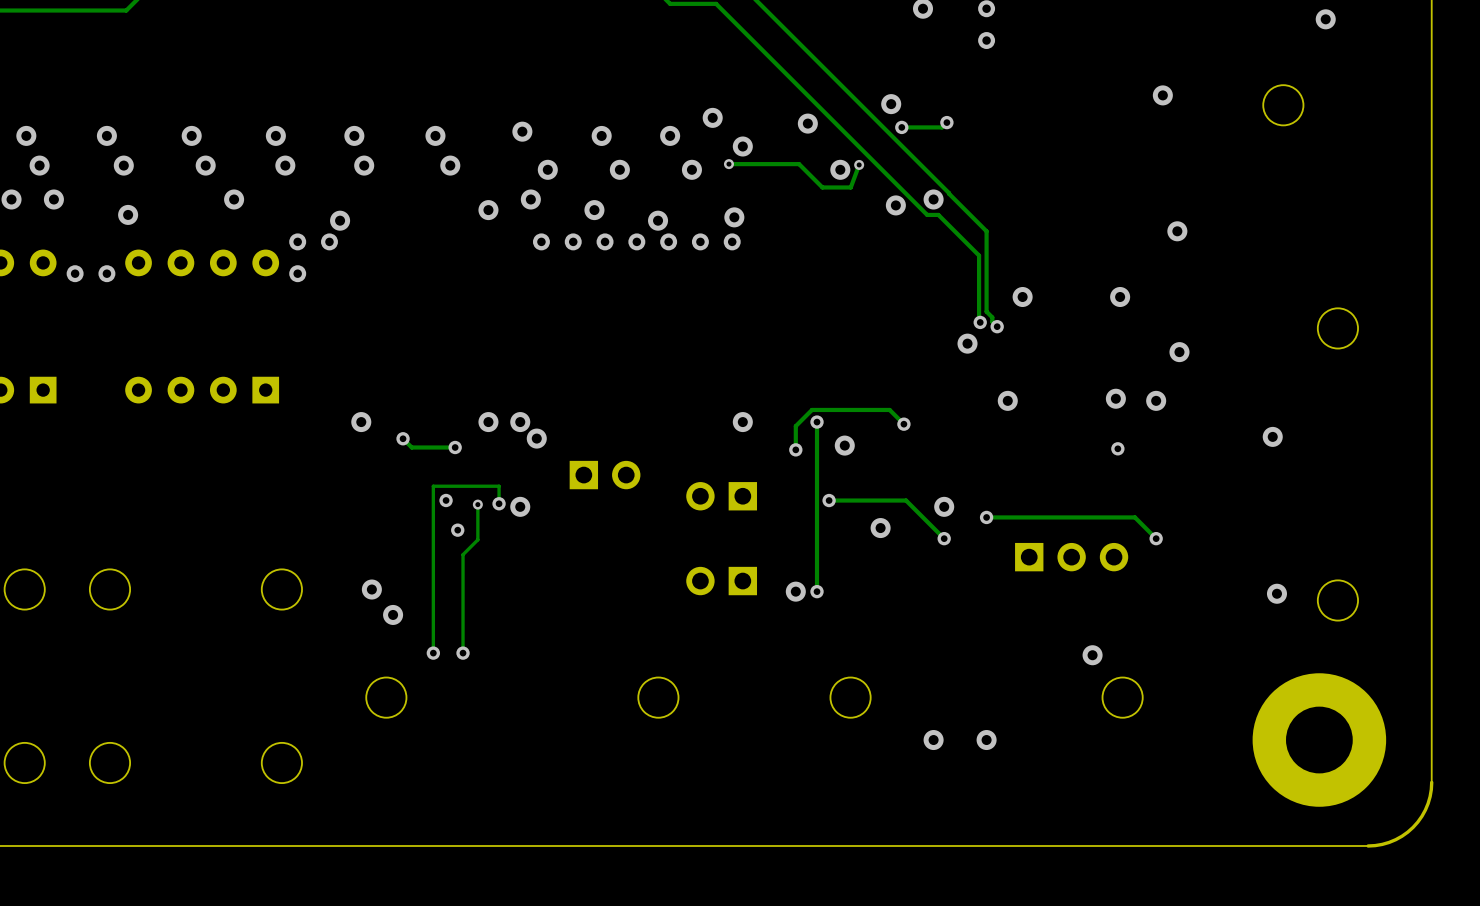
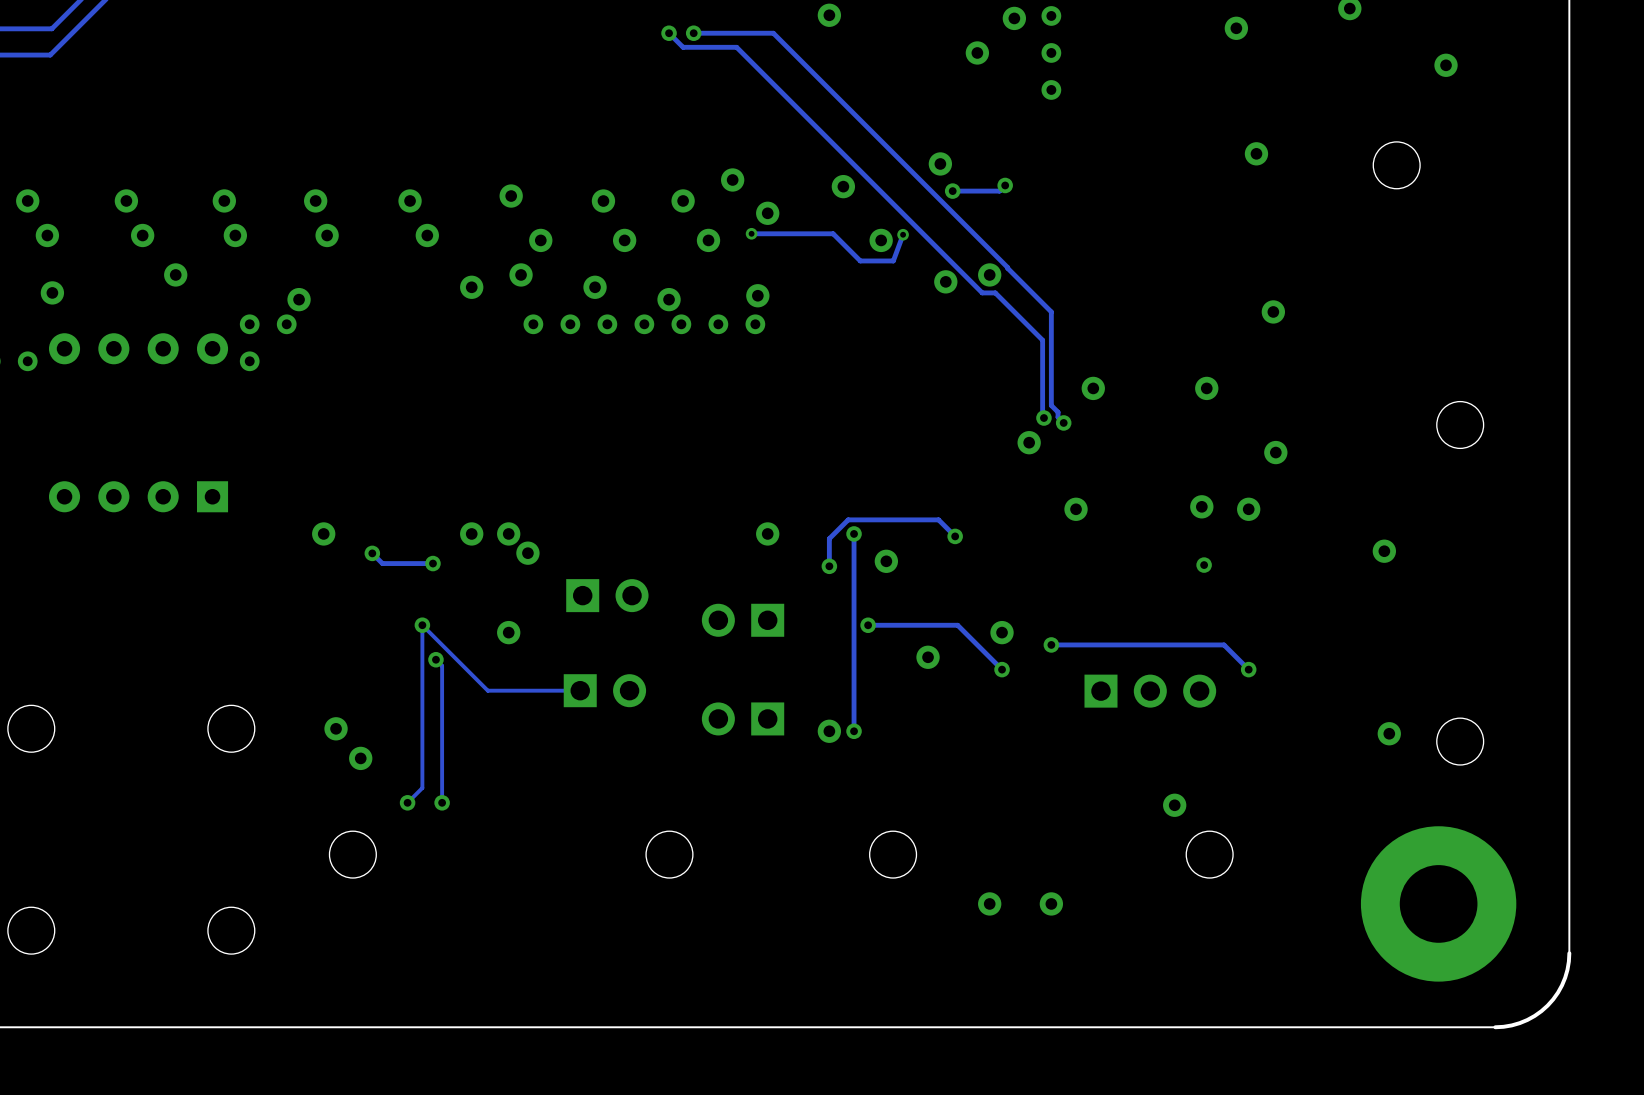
track: (499, 503) (499, 486) (433, 486) (433, 653) -> (580, 690) (487, 690) (422, 625) (422, 788) (407, 802)
via: (499, 503) -> none
track: (477, 504) (477, 539) (463, 554) -> (435, 659) (442, 665) (442, 688)
via: (477, 504) -> none
part: none -> (604, 690)

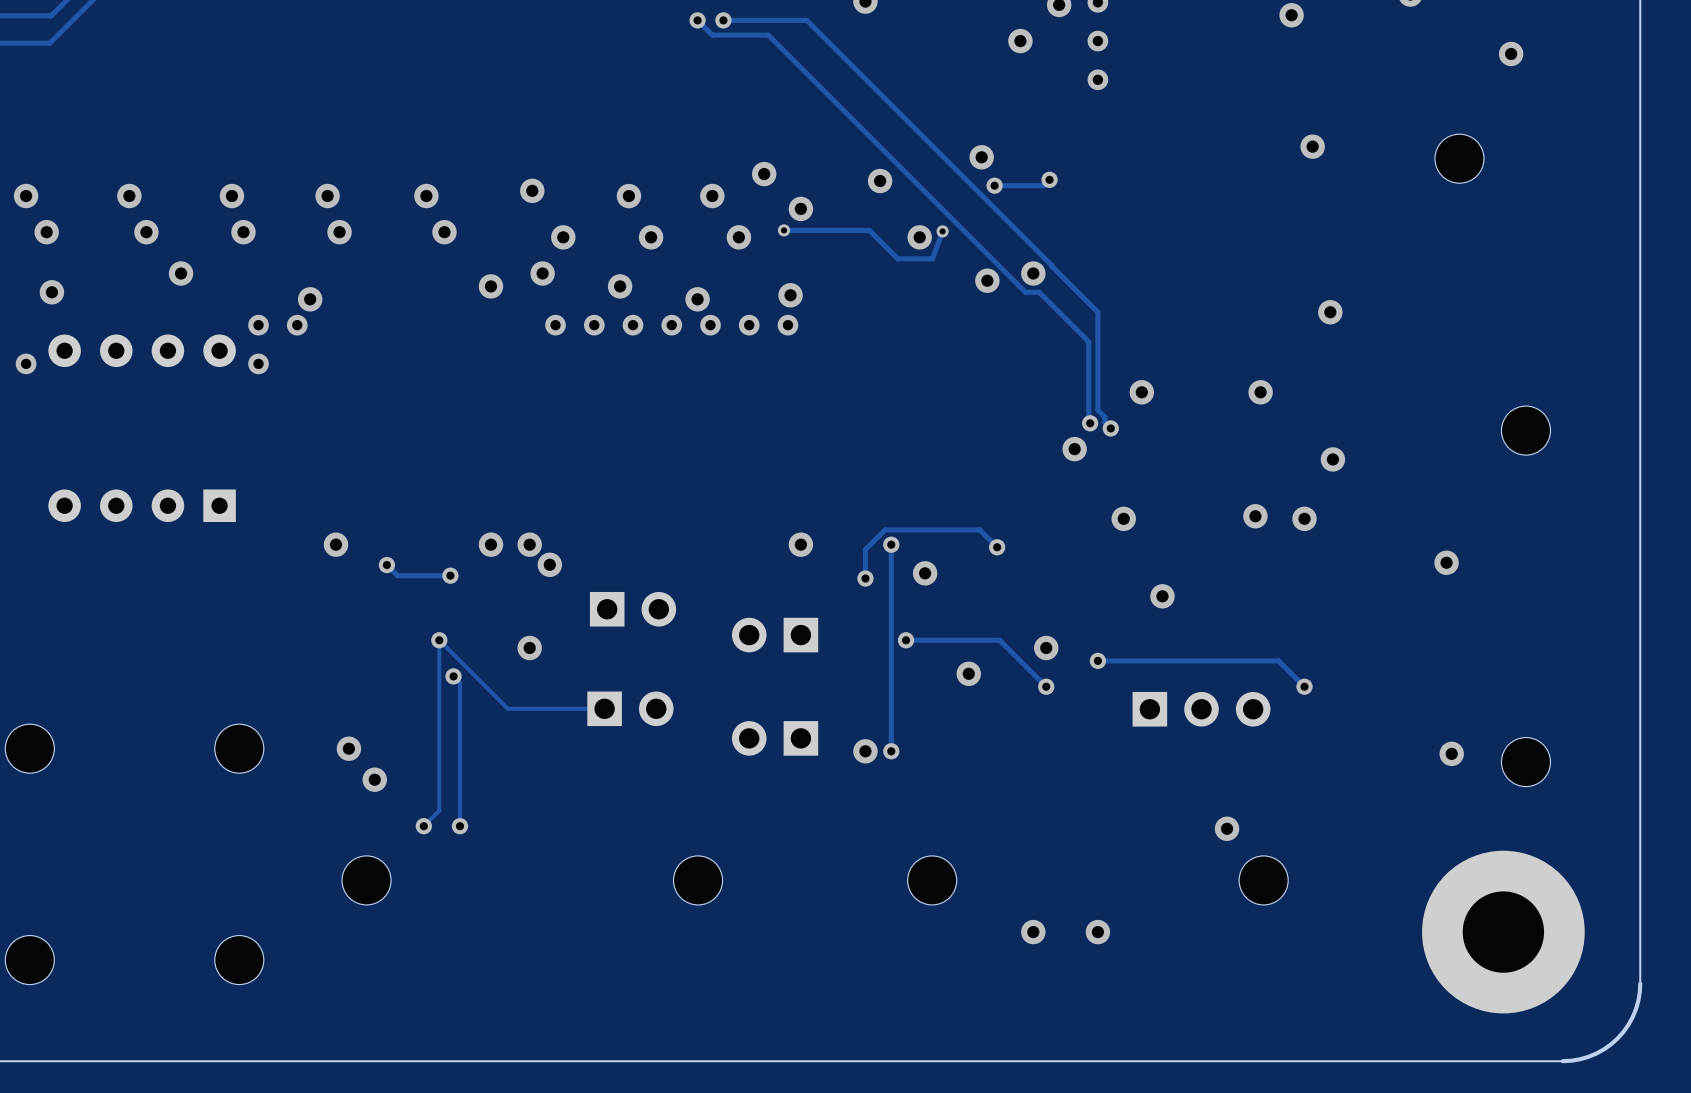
via: (1204, 565) -> none
via: none -> (1162, 596)

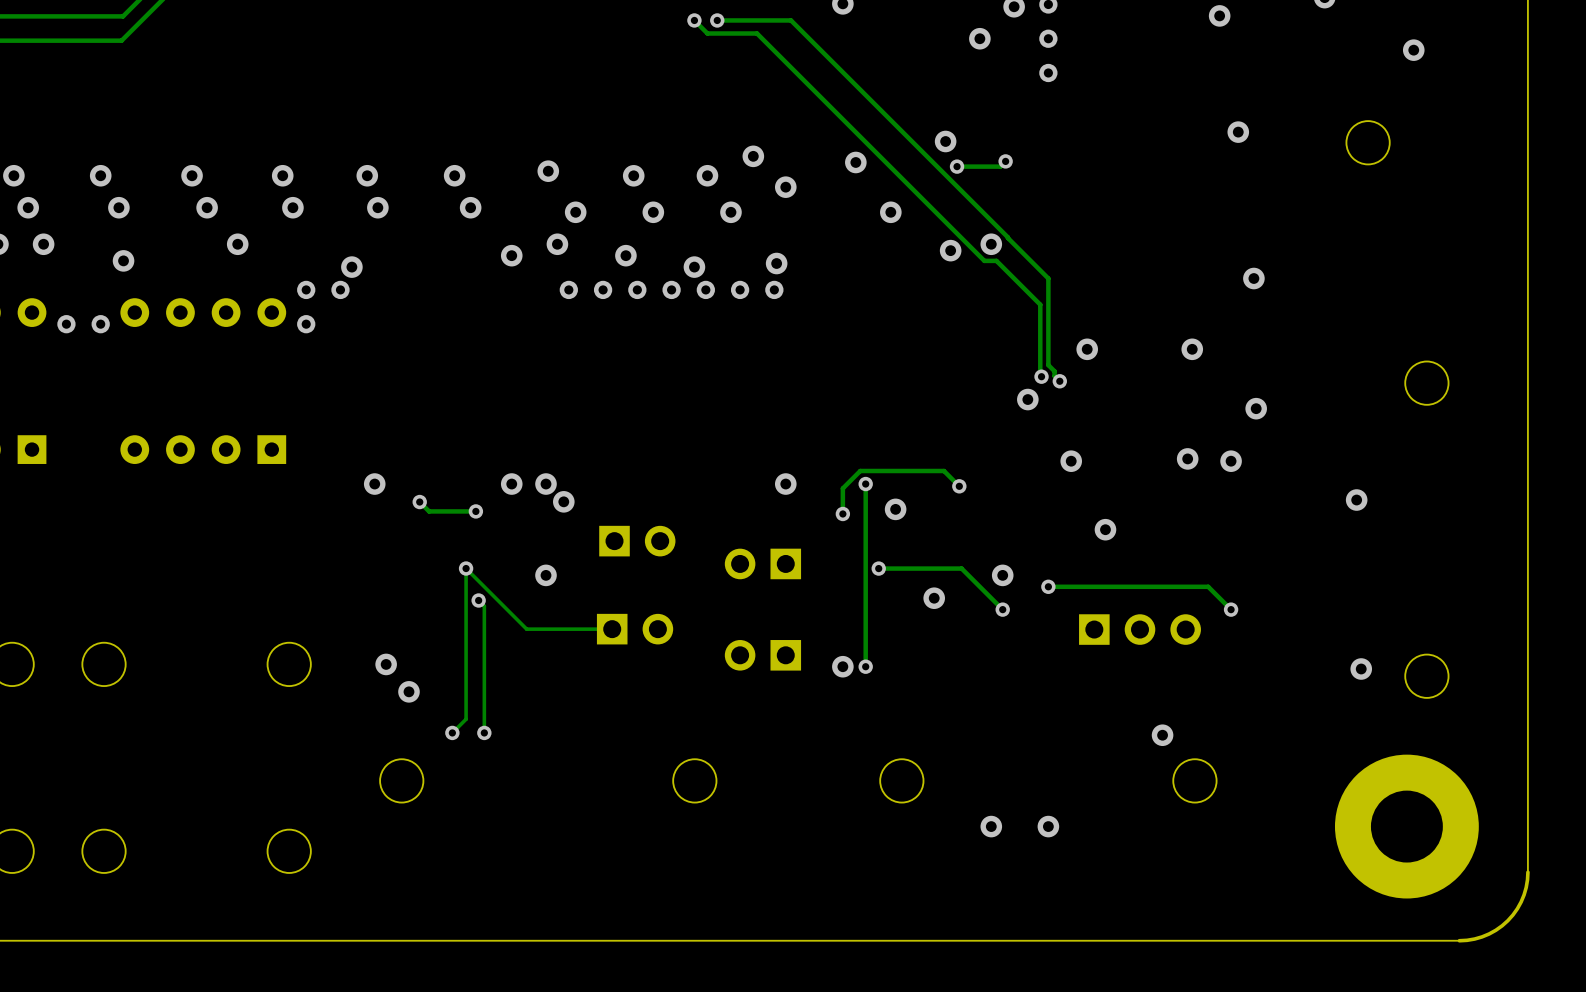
track: (784, 230) (869, 230) (897, 258) (932, 258) (942, 231) -> none
via: (784, 230) -> none
via: (942, 231) -> none

